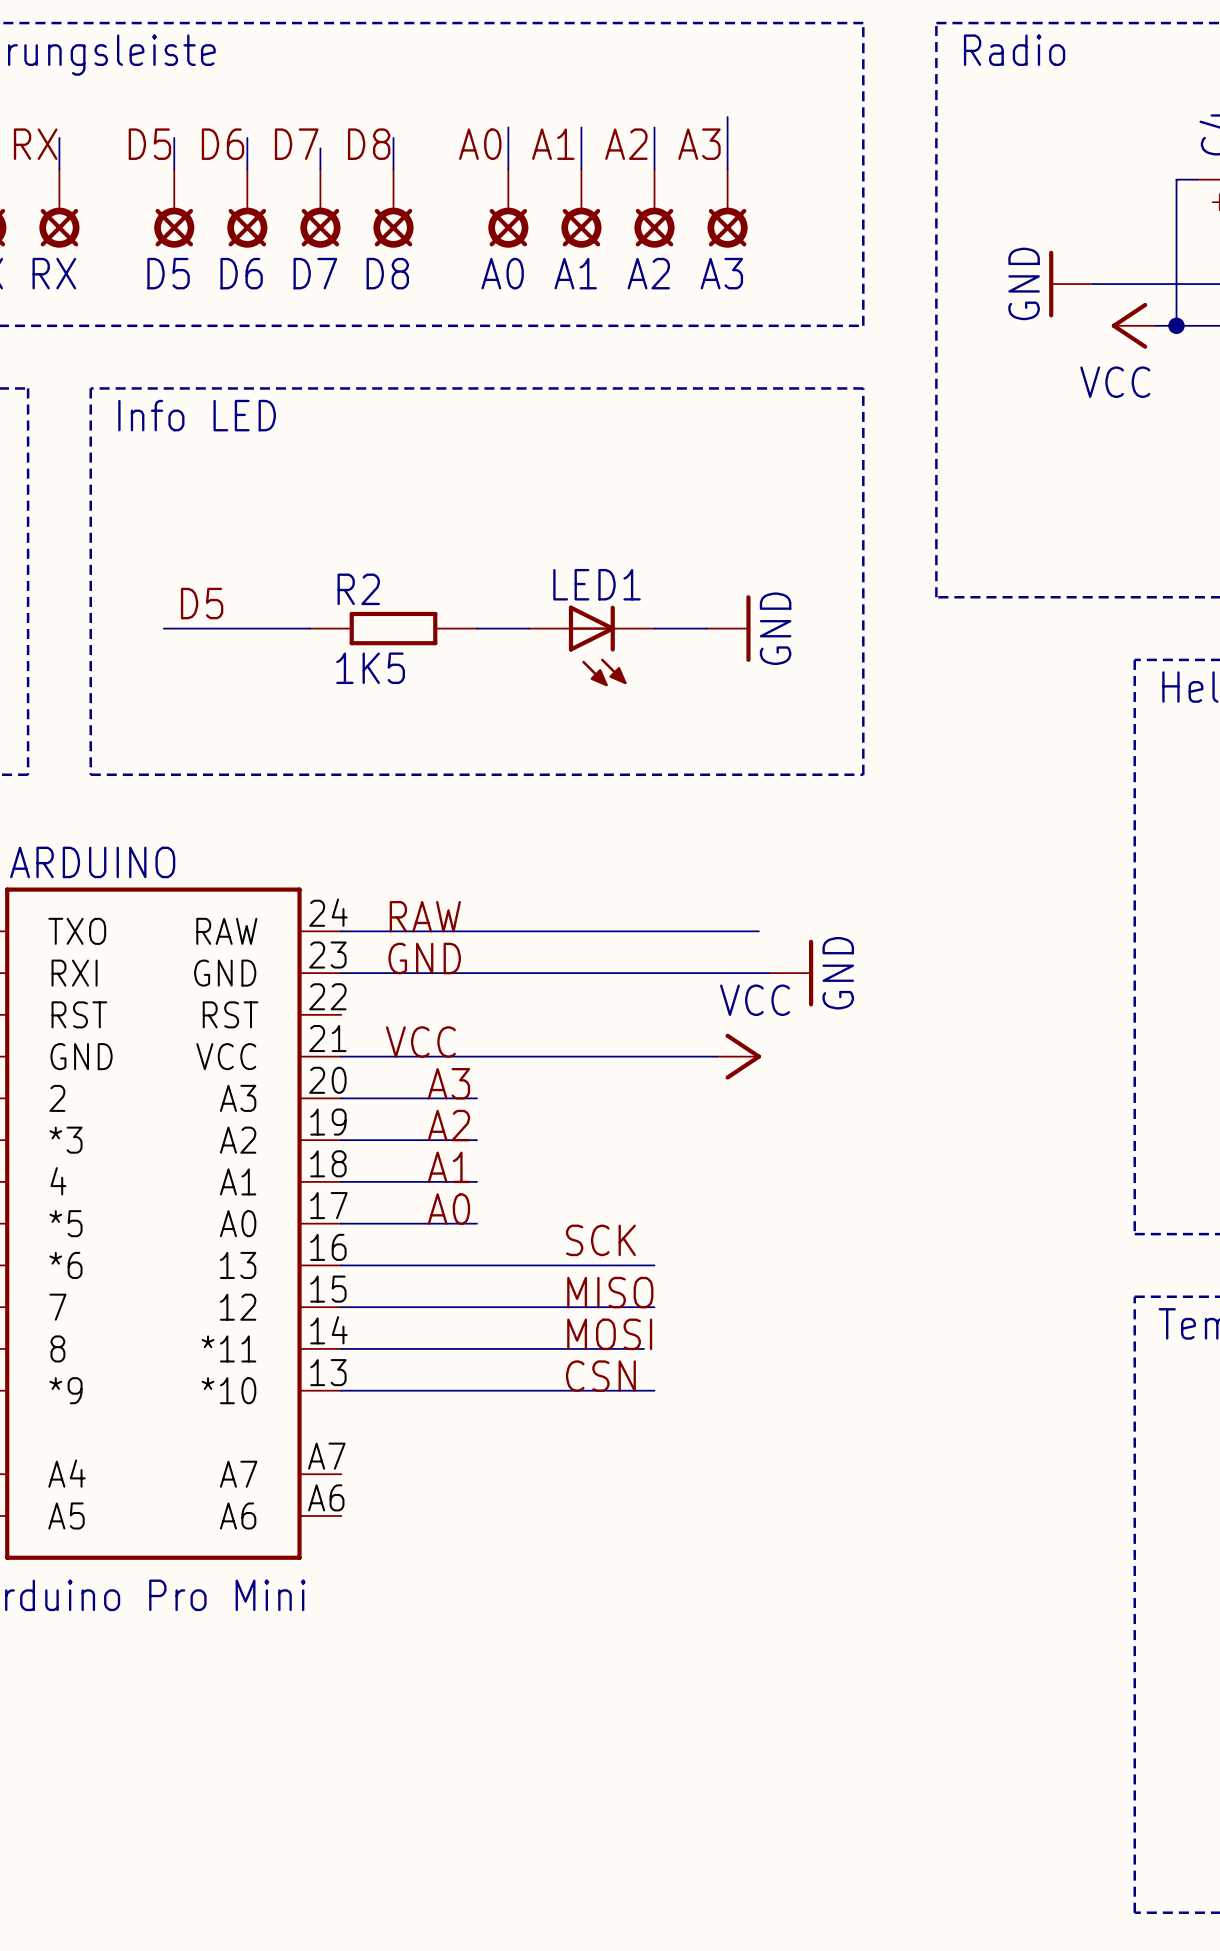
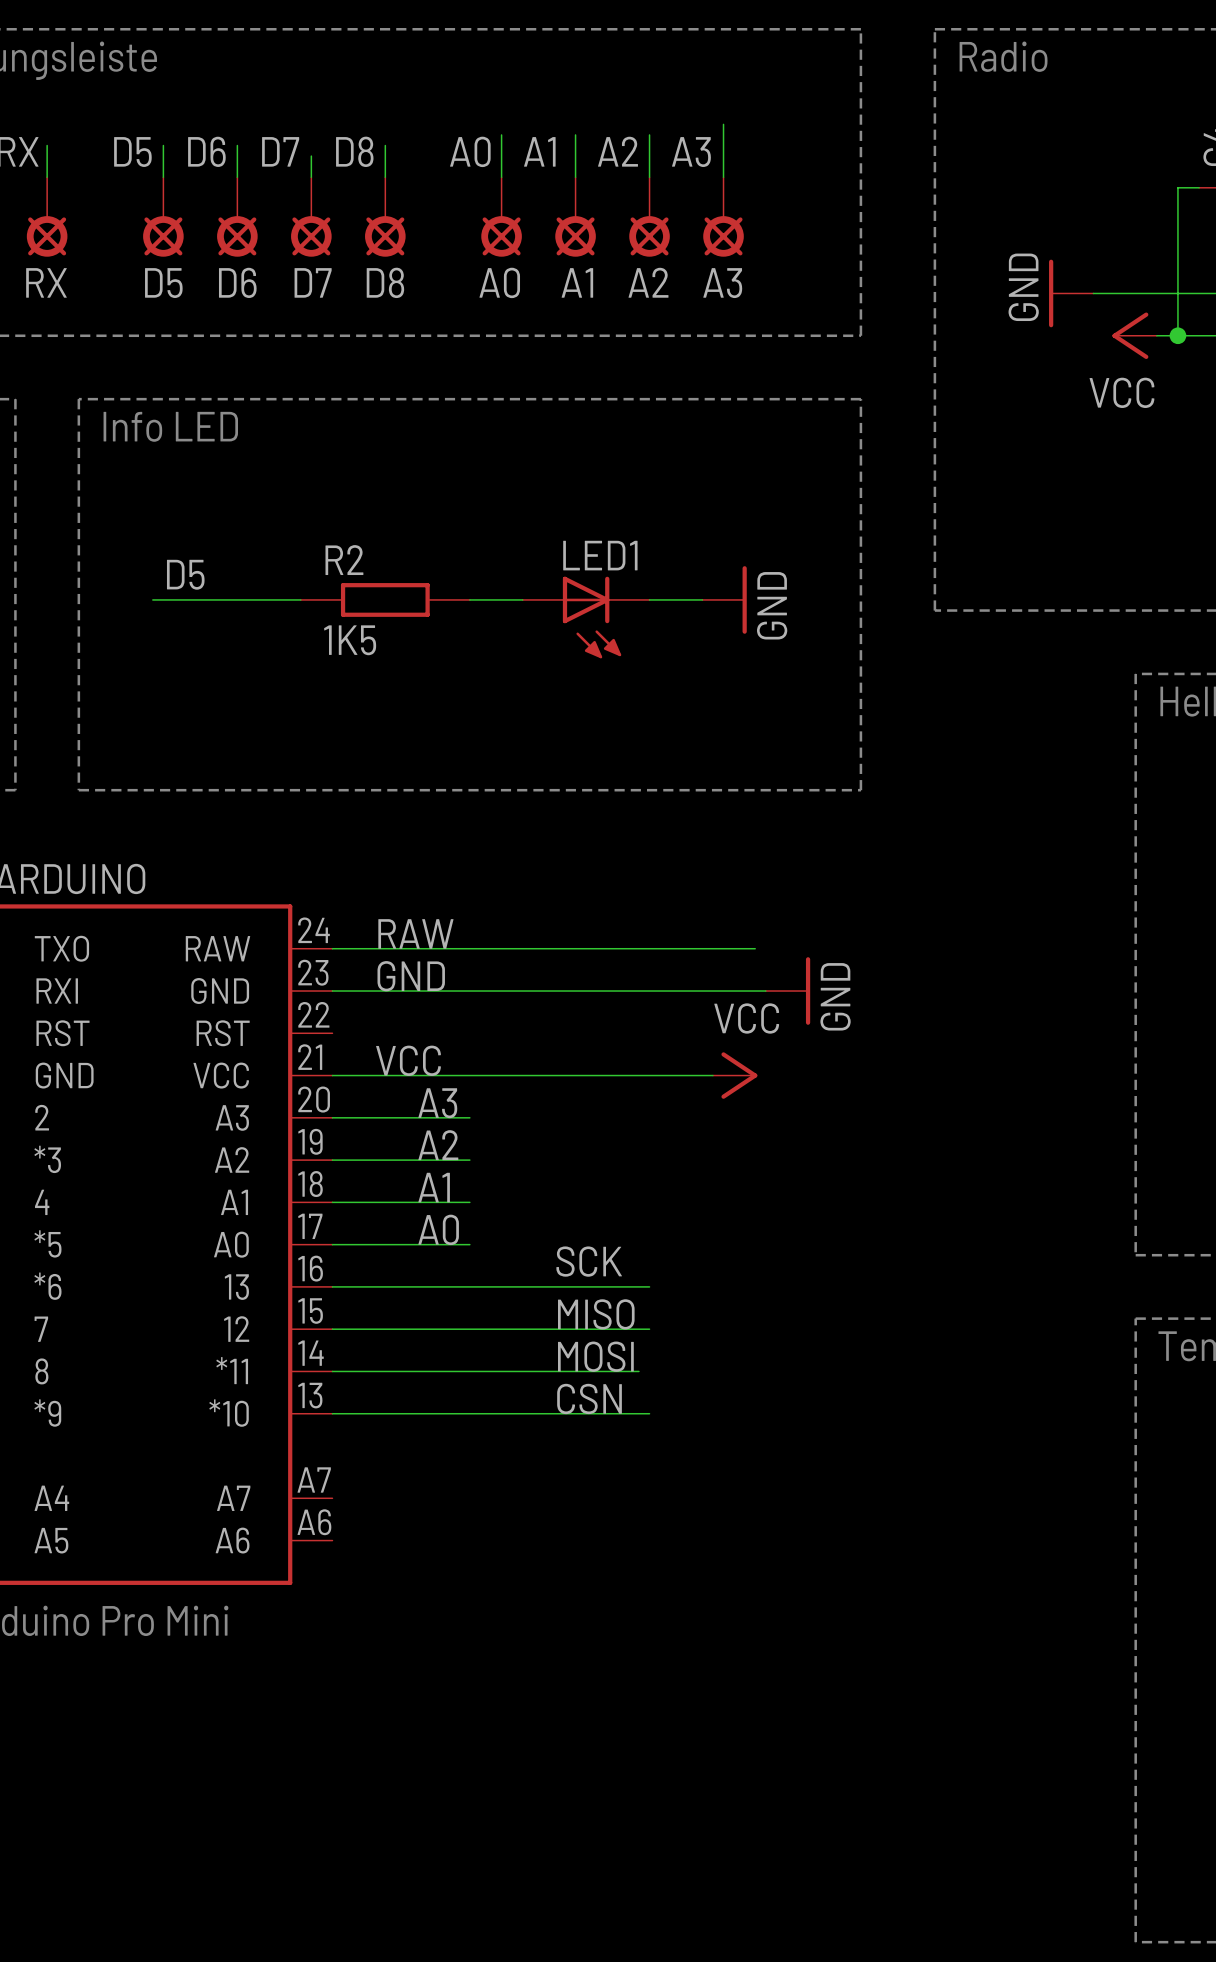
label position: D5 (202, 603) -> D5 (185, 574)
wire: (163, 628) (309, 628) -> (152, 599) (300, 599)
R2 position: (393, 628) -> (385, 599)
wire: (477, 628) (529, 628) -> (469, 599) (522, 599)
wire: (654, 628) (706, 628) -> (649, 599) (702, 599)
power symbol position: GND (728, 628) -> GND (724, 599)
LED1 position: (591, 645) -> (586, 617)

